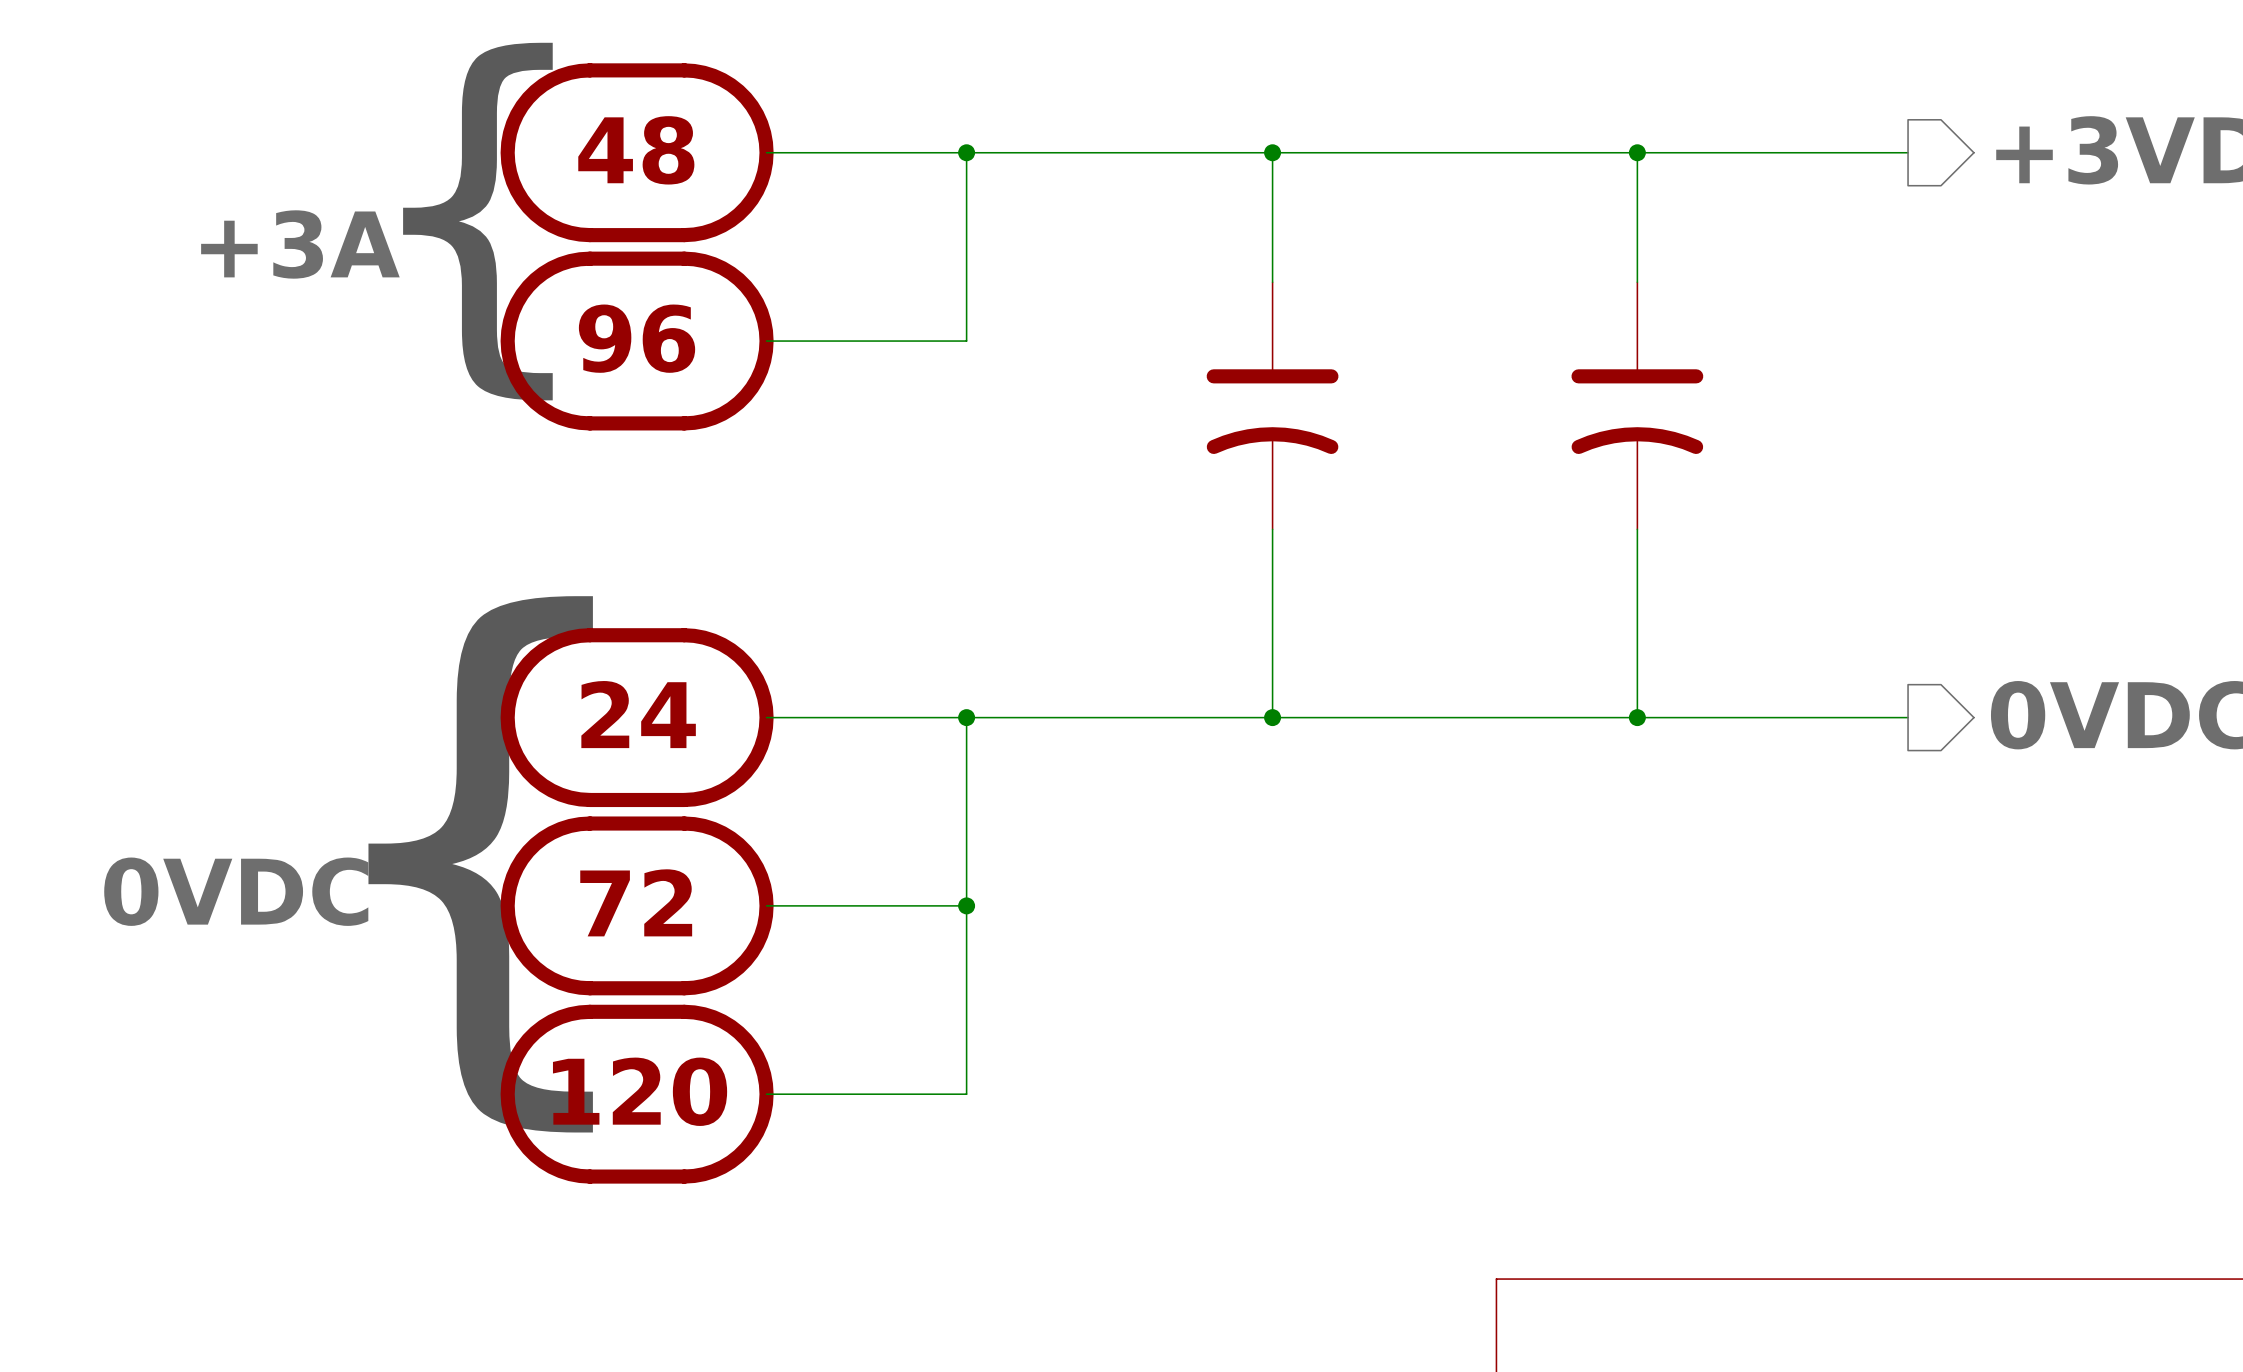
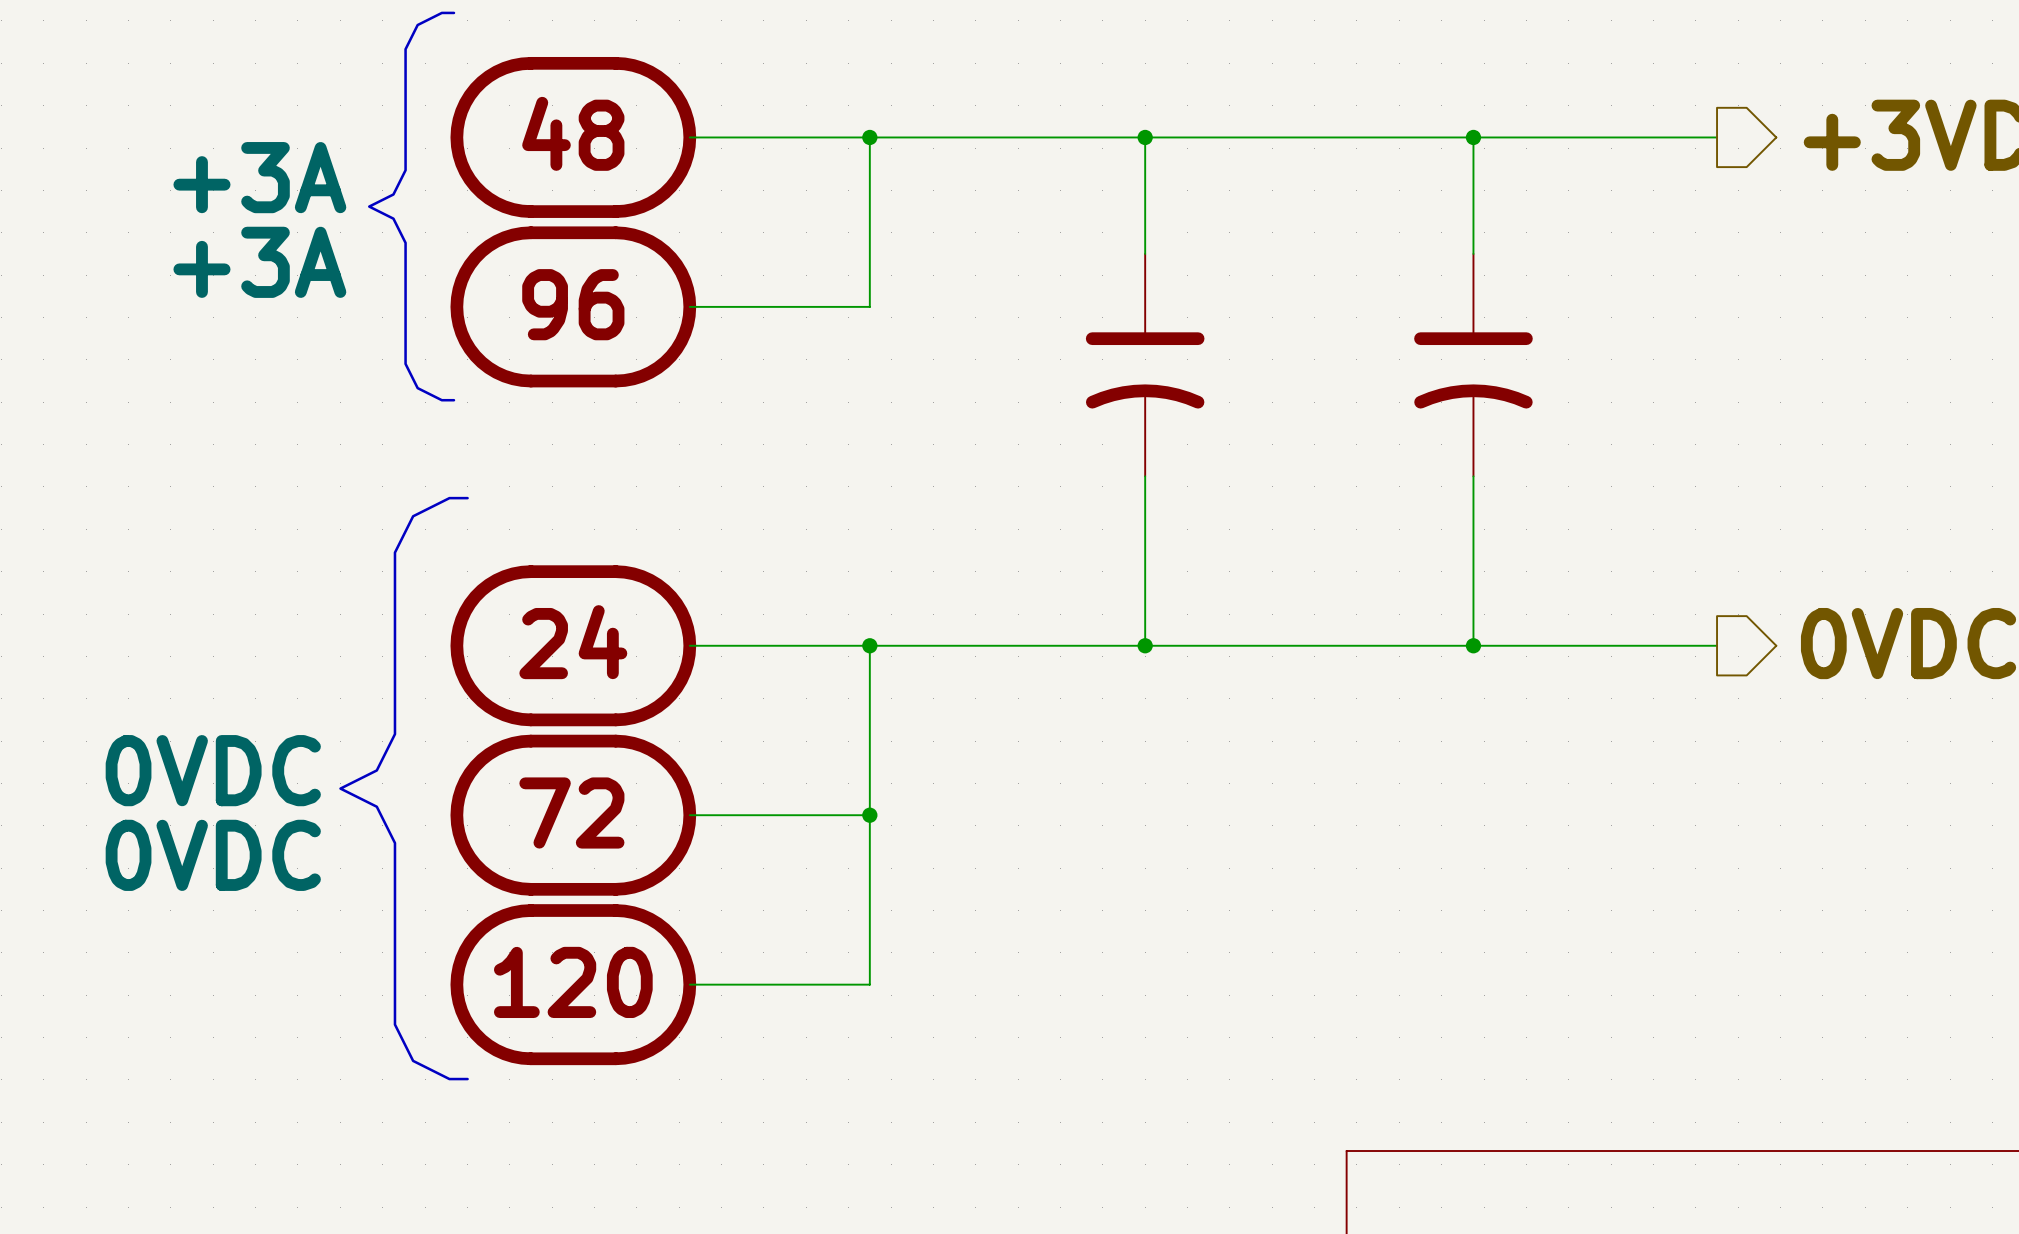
part text position: +3A (300, 244) -> +3A (259, 177)
part text: none -> +3A (259, 262)
part text position: 0VDC (236, 891) -> 0VDC (213, 770)
part text: none -> 0VDC (213, 855)

